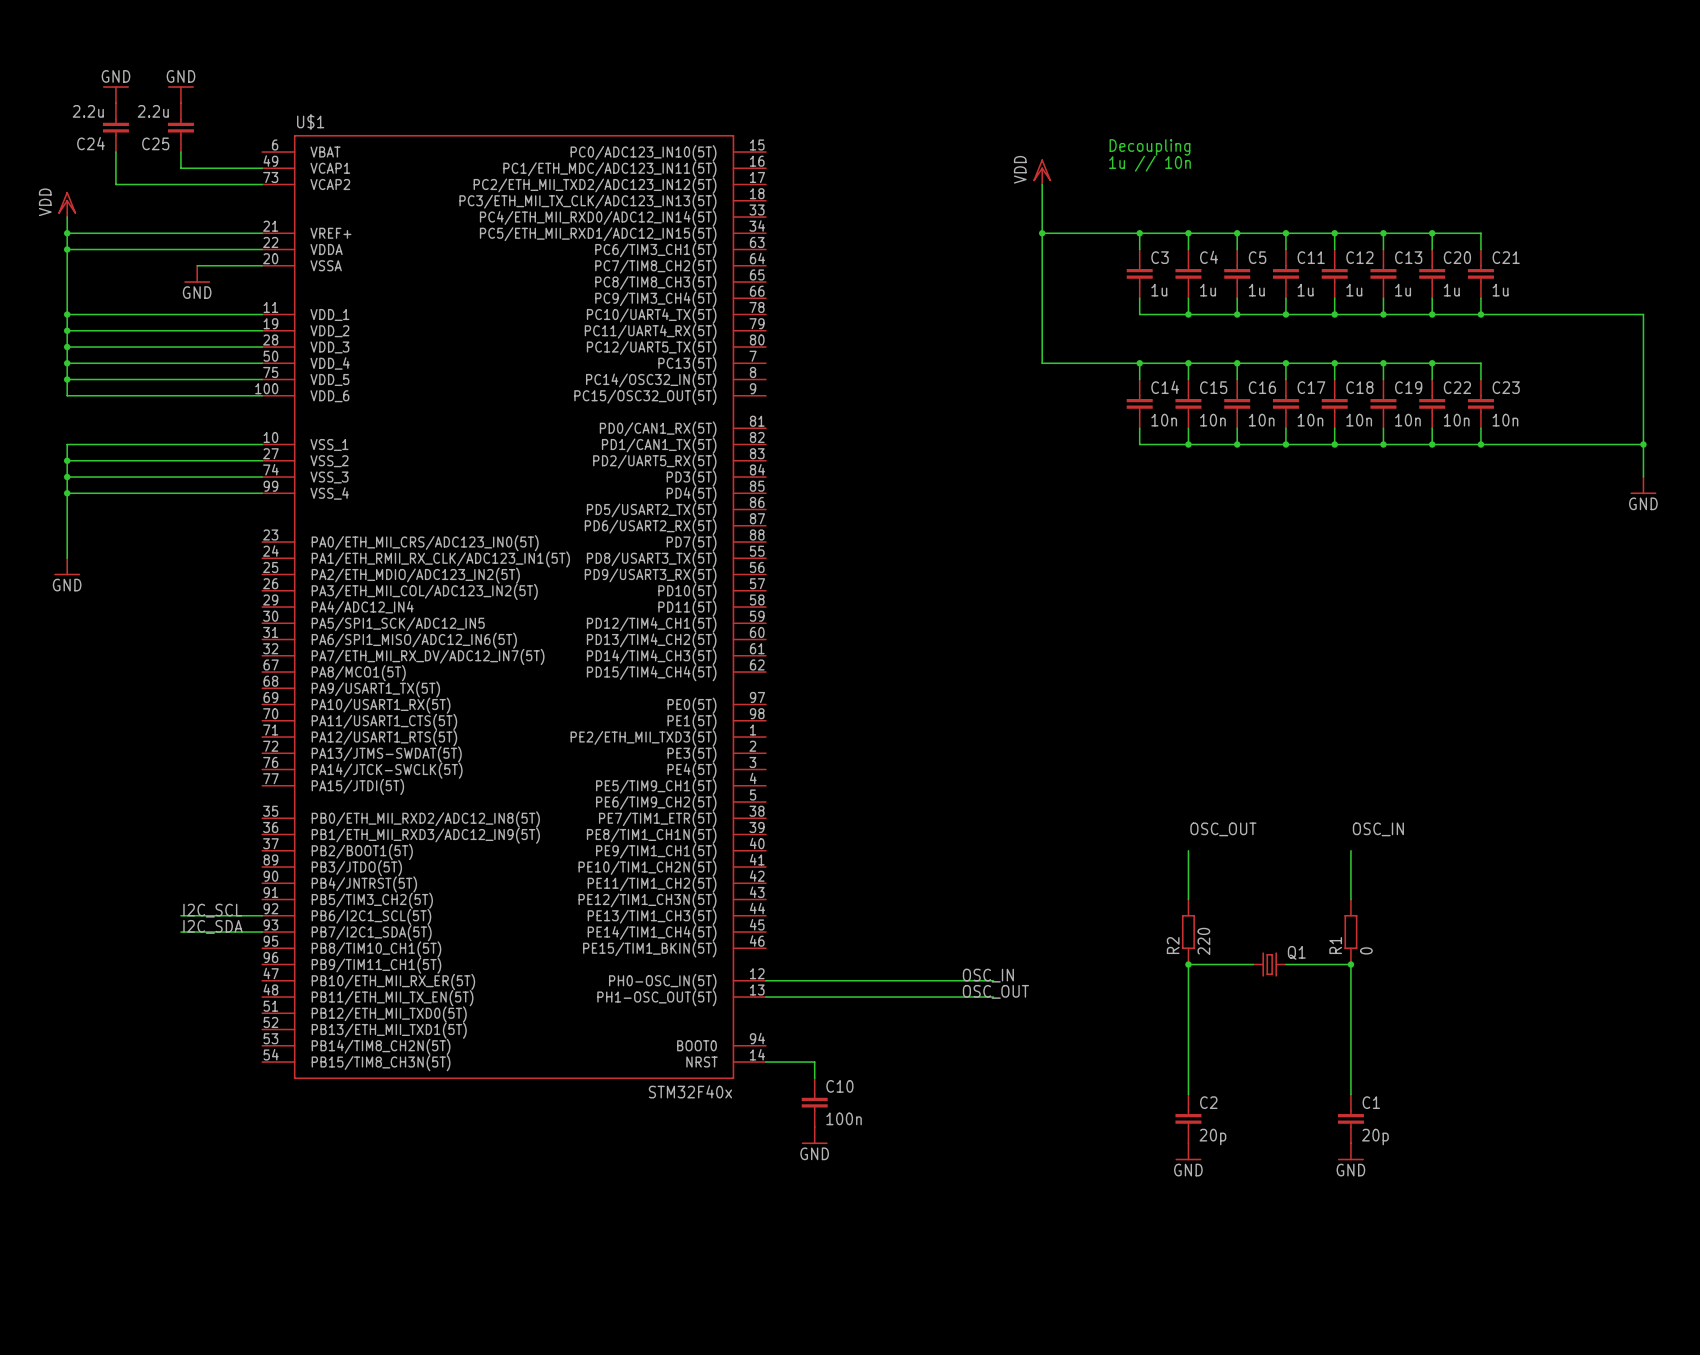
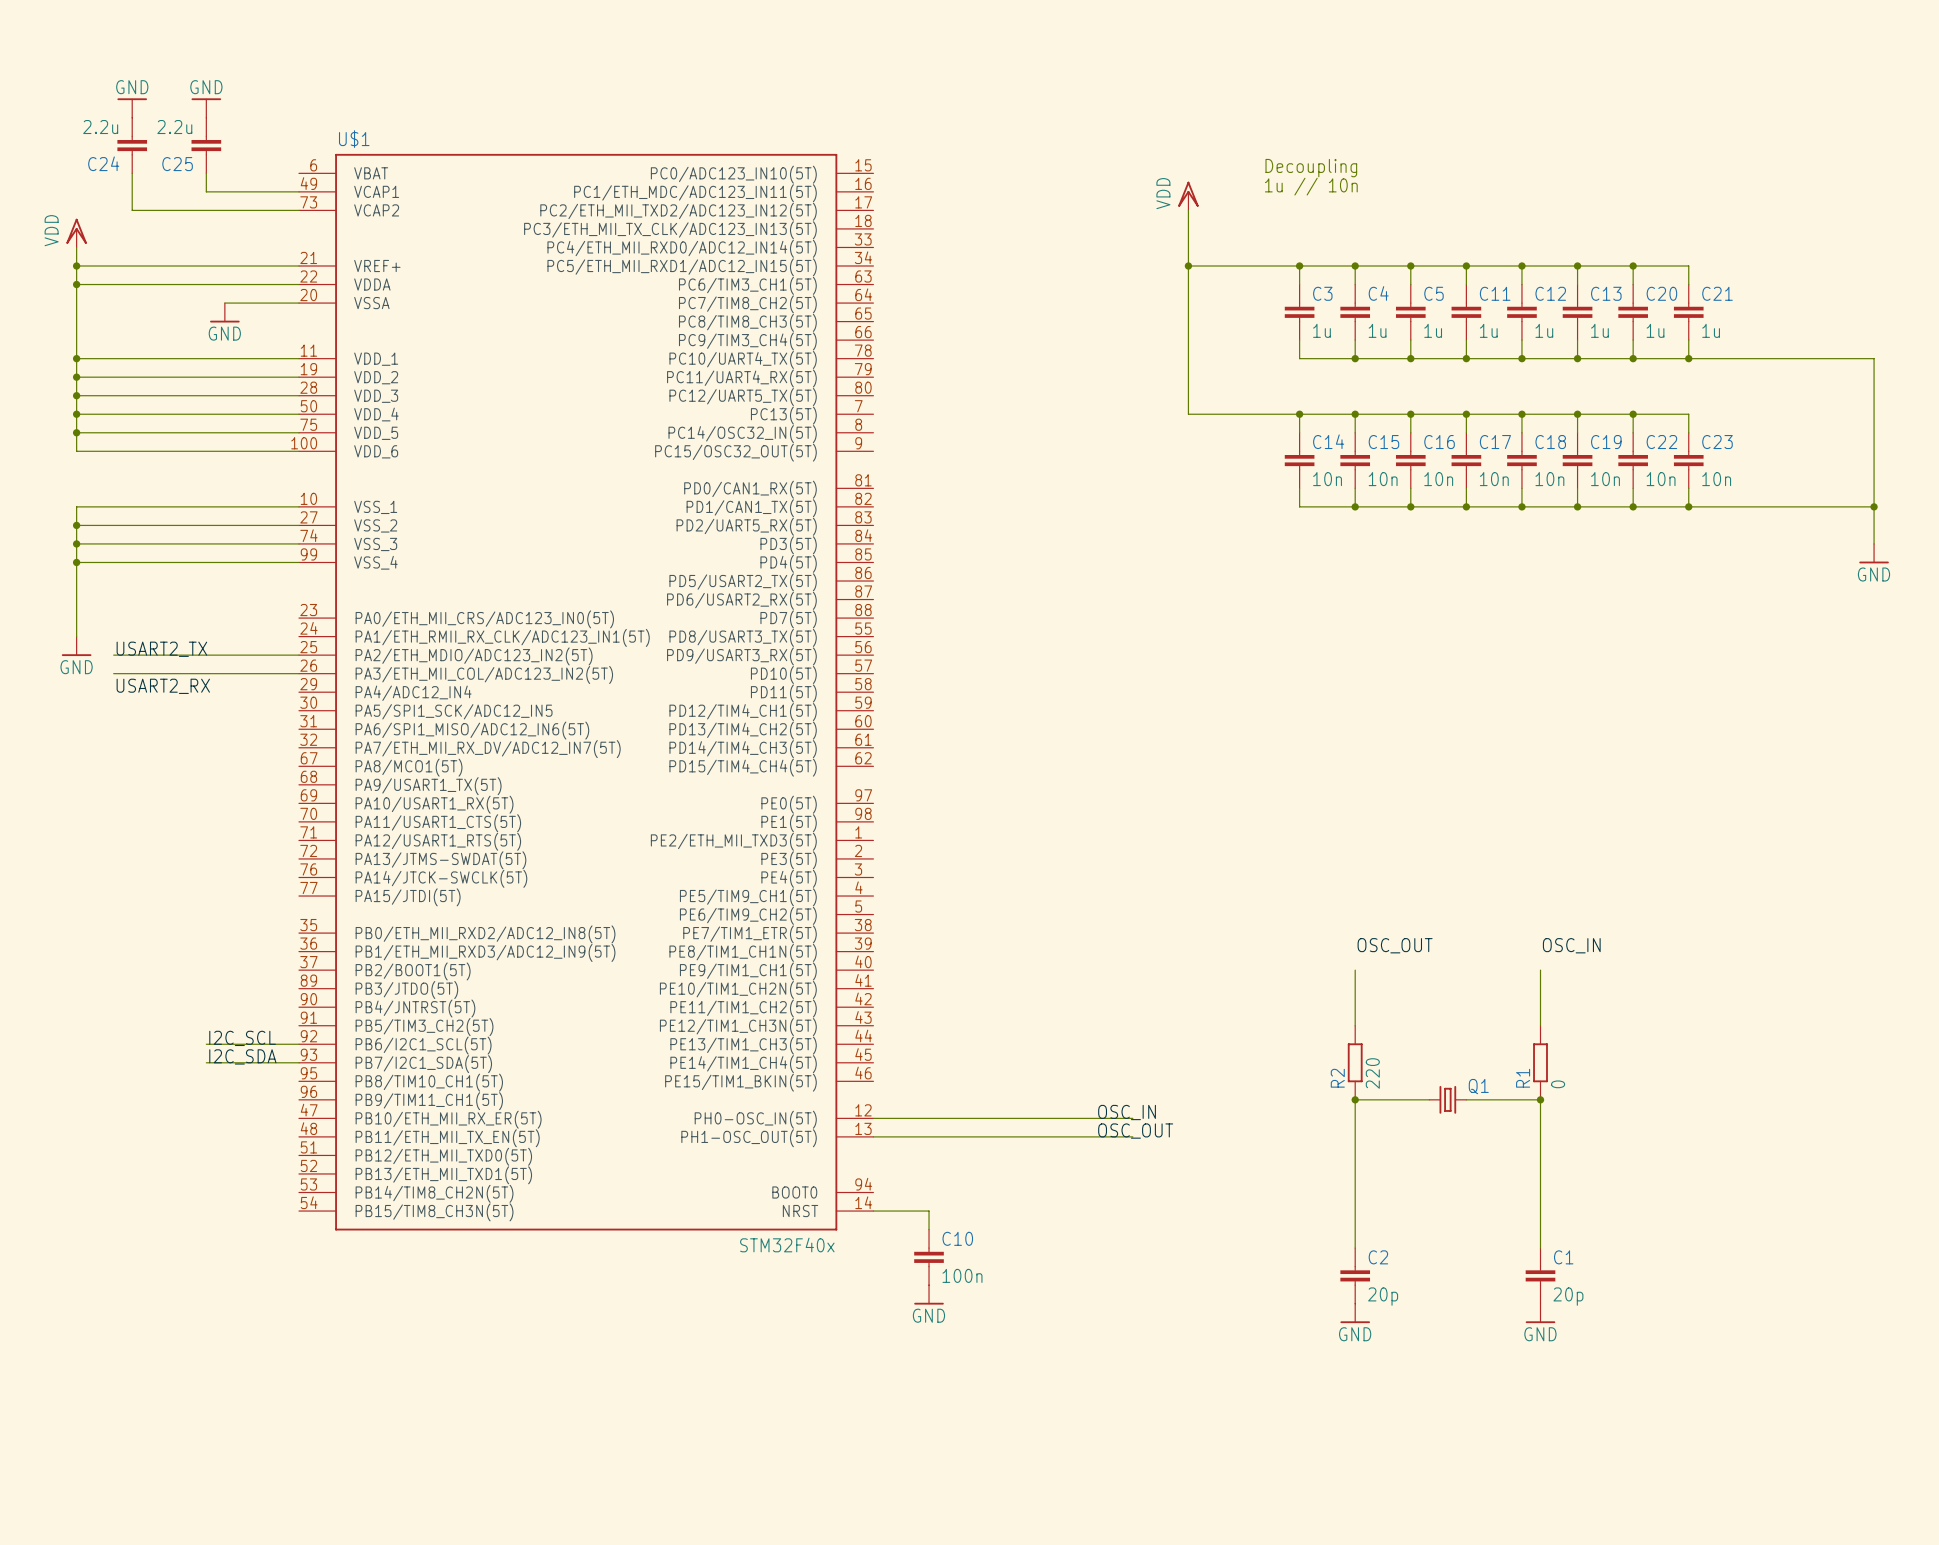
label: none -> USART2_TX (161, 649)
wire: none -> (113, 655) (298, 655)
wire: none -> (113, 673) (298, 673)
label: none -> USART2_RX (163, 686)

